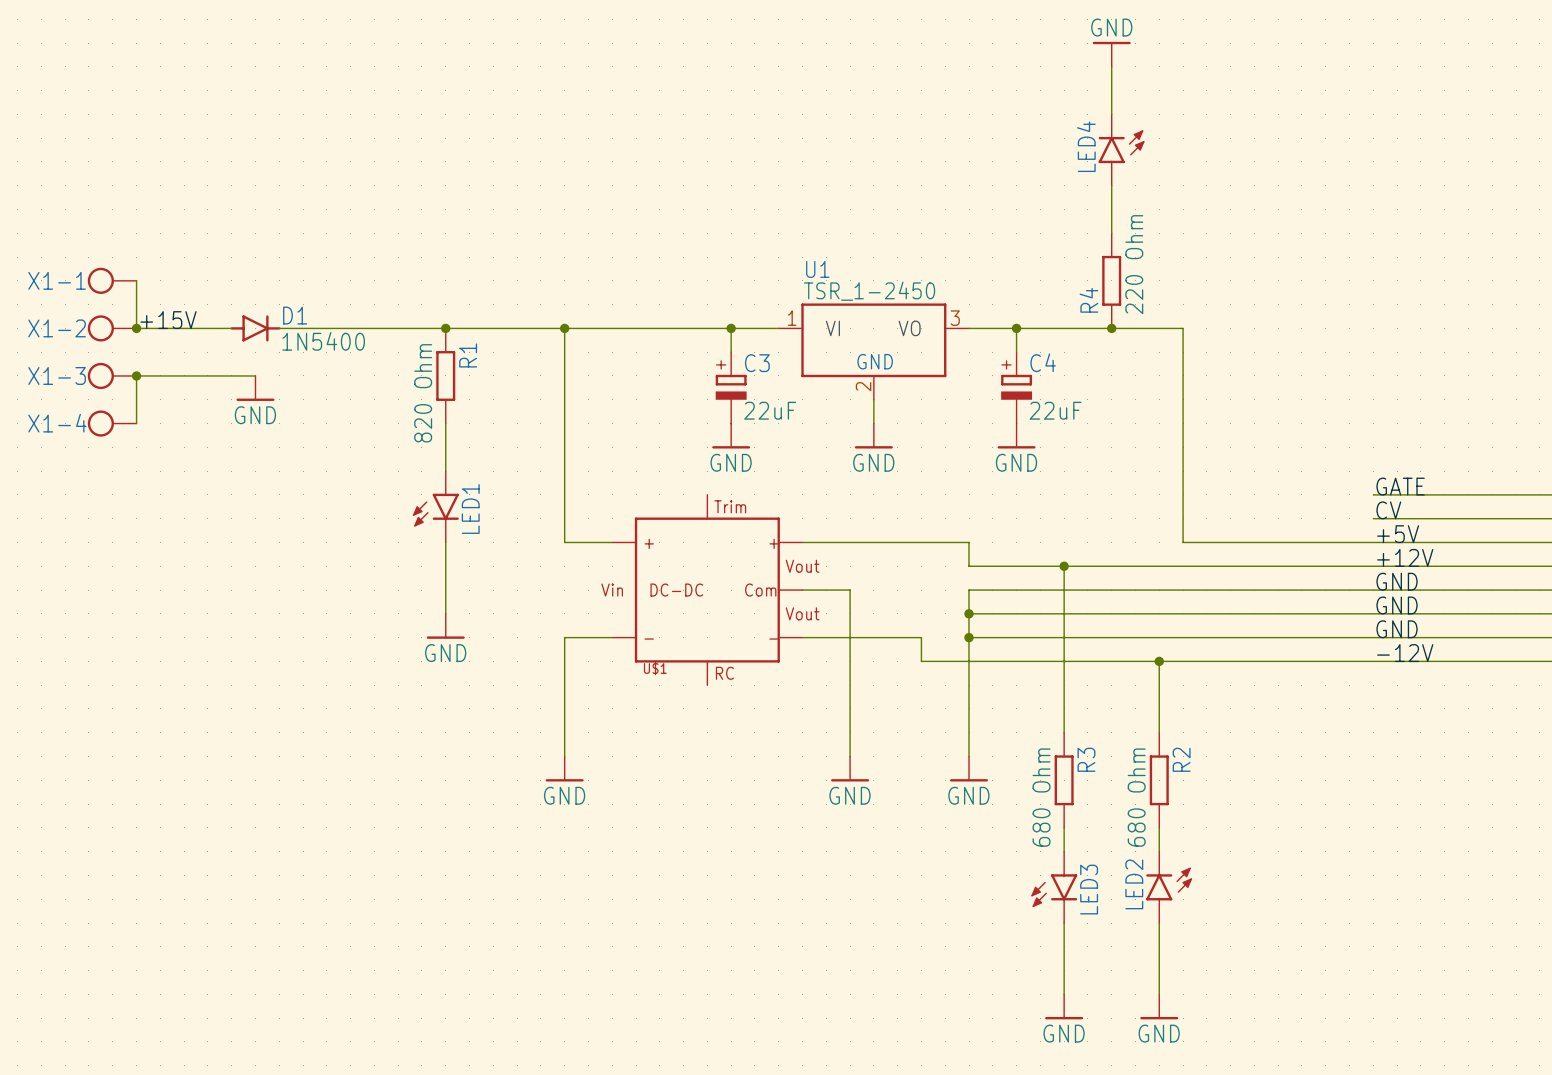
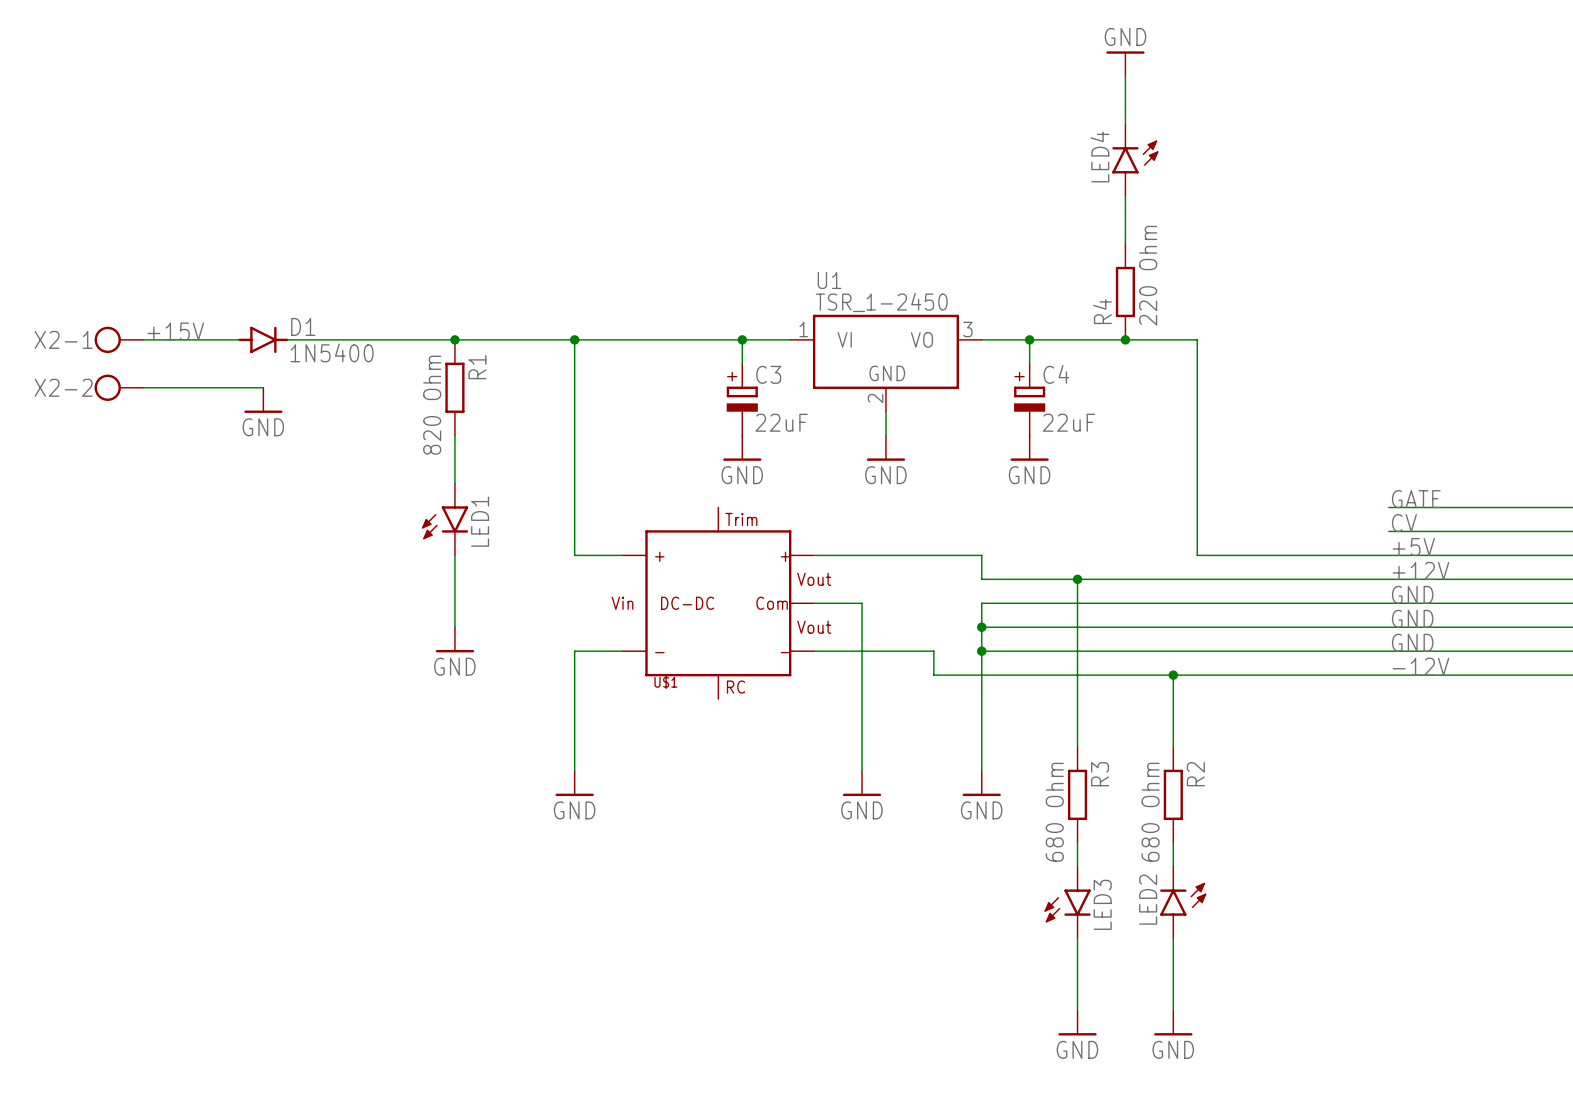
X1-1: (112, 280) -> none
wire: (136, 280) (136, 328) -> none
X1-2 name: X1-2 (57, 328) -> X2-1 (63, 339)
junction: (136, 328) -> none
X1-3 name: X1-3 (57, 375) -> X2-2 (63, 387)
wire: (136, 375) (136, 423) -> none
junction: (136, 375) -> none
X1-4: (112, 423) -> none

